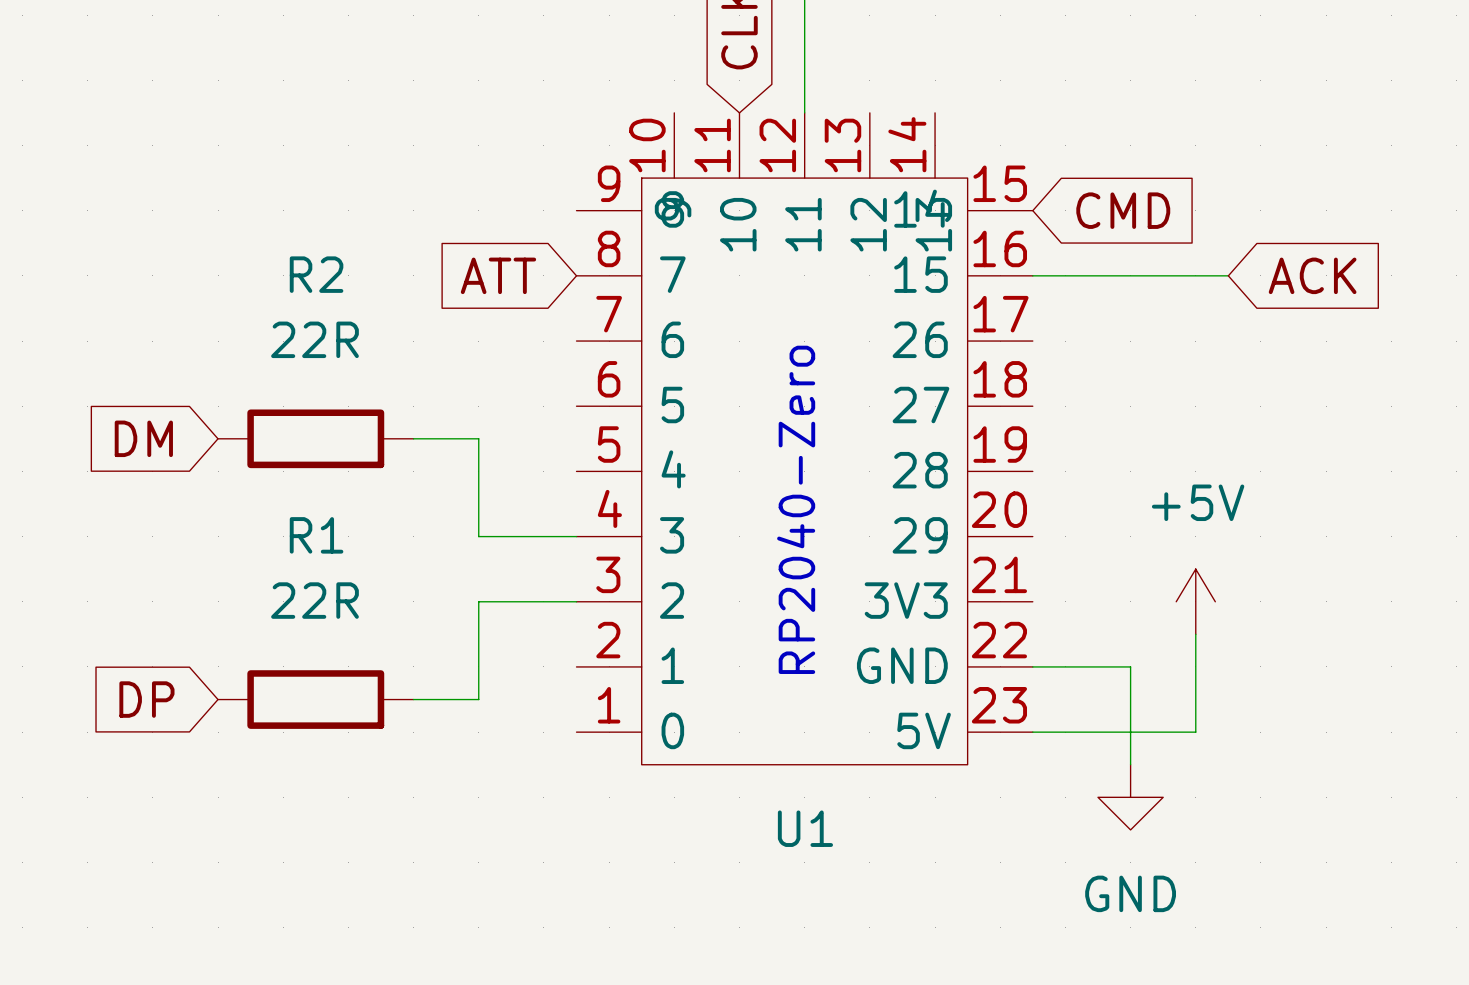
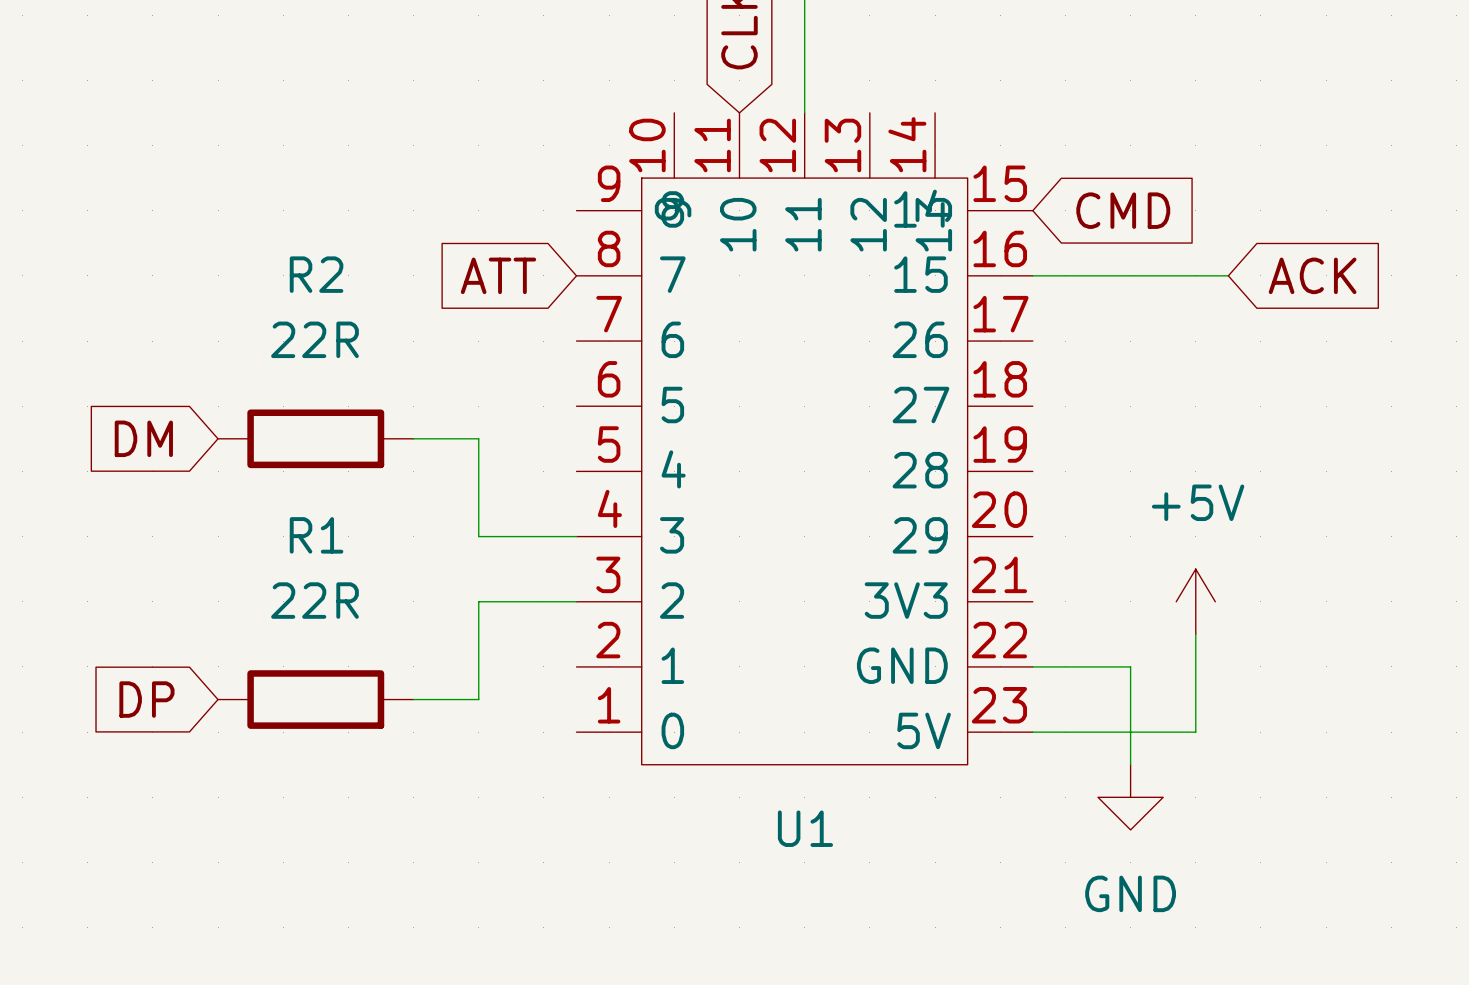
text: RP2040-Zero (796, 509) -> none

